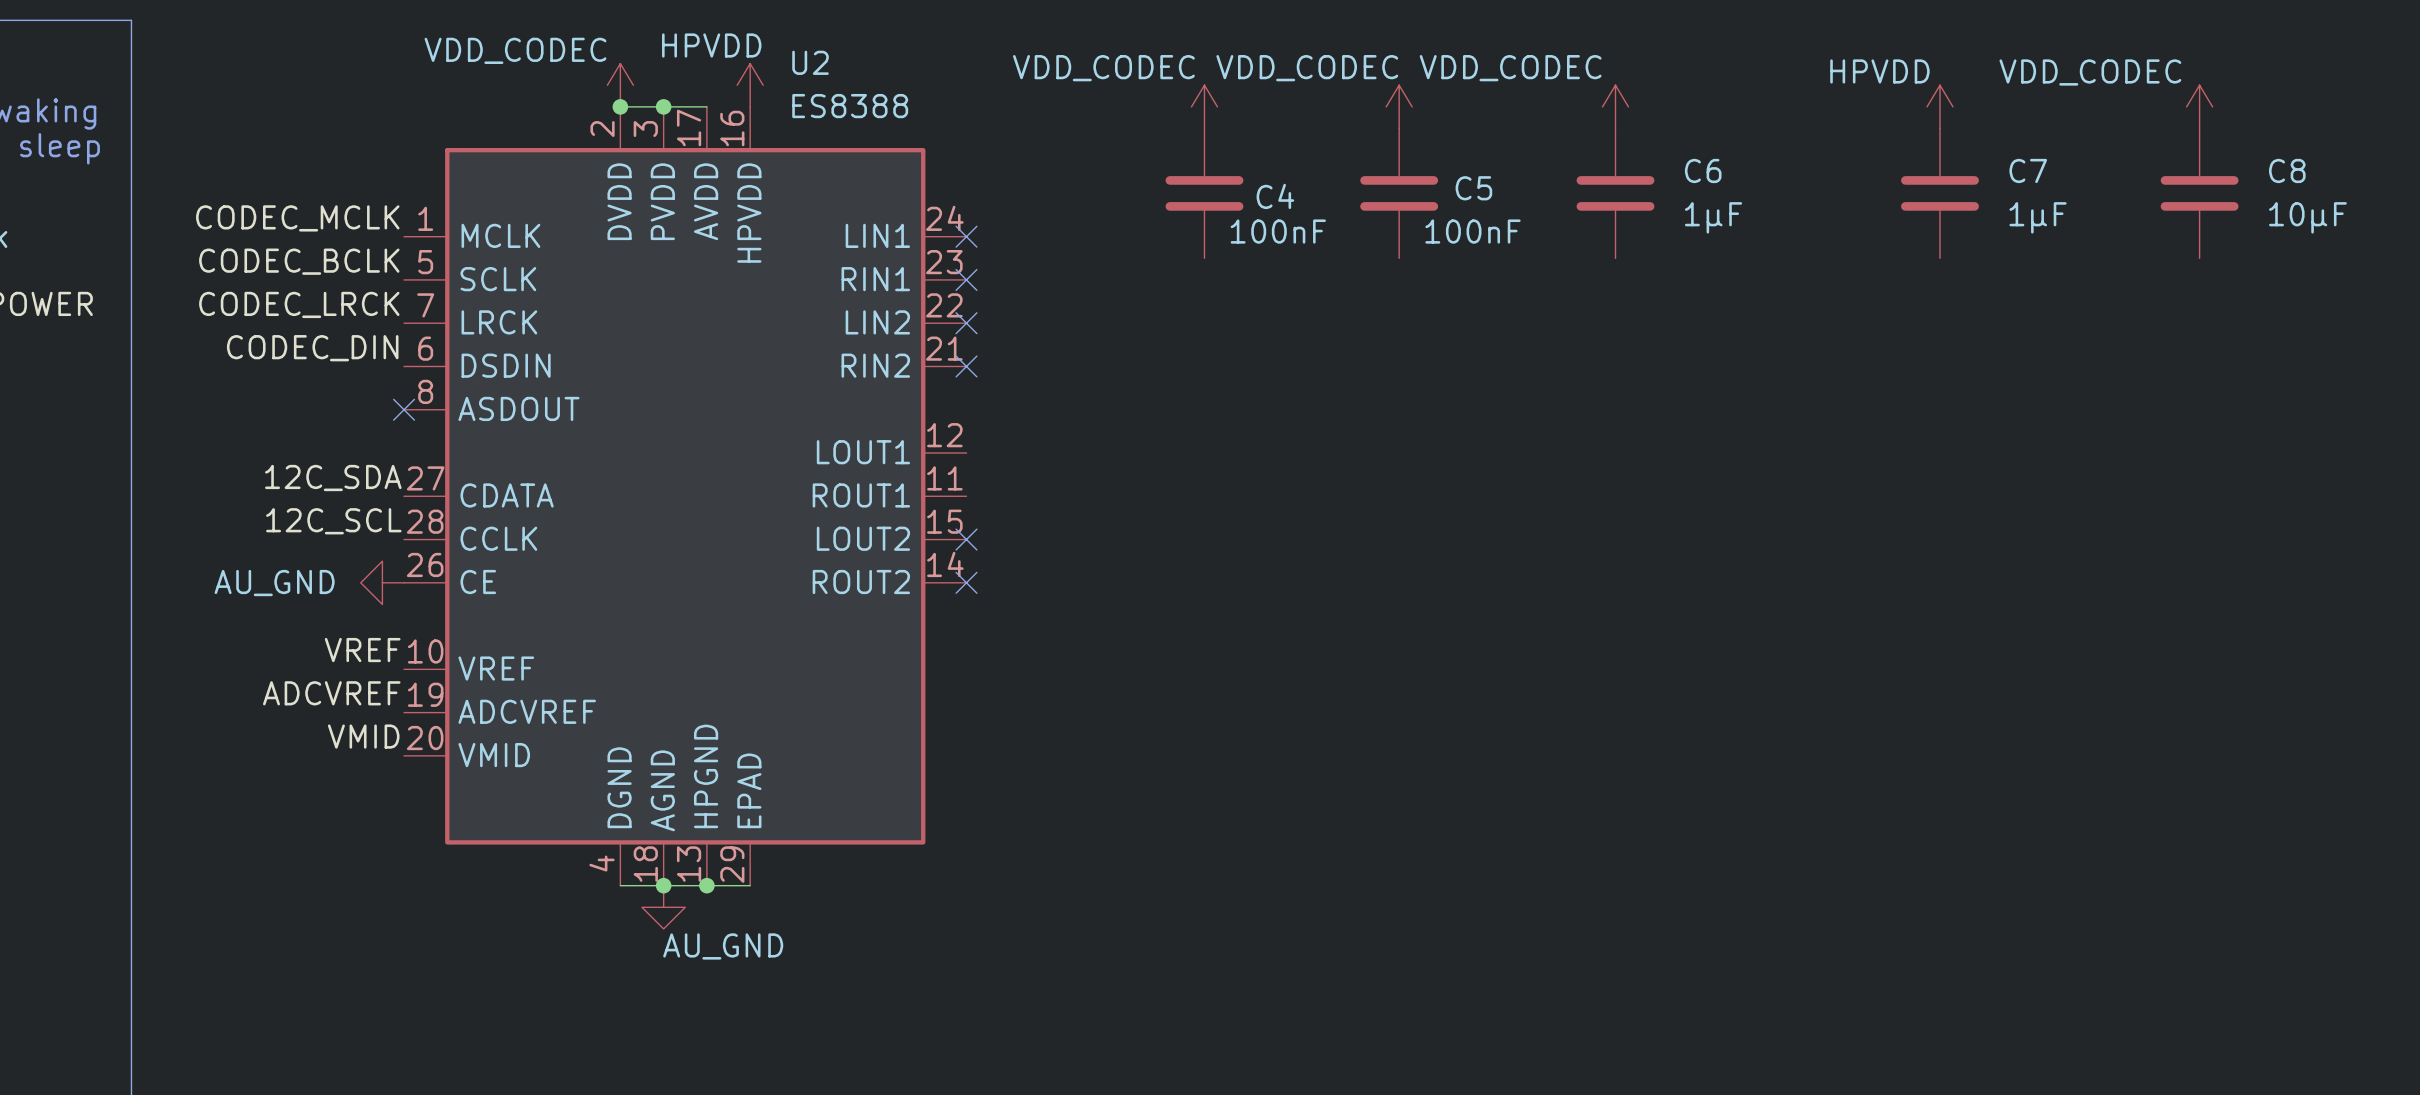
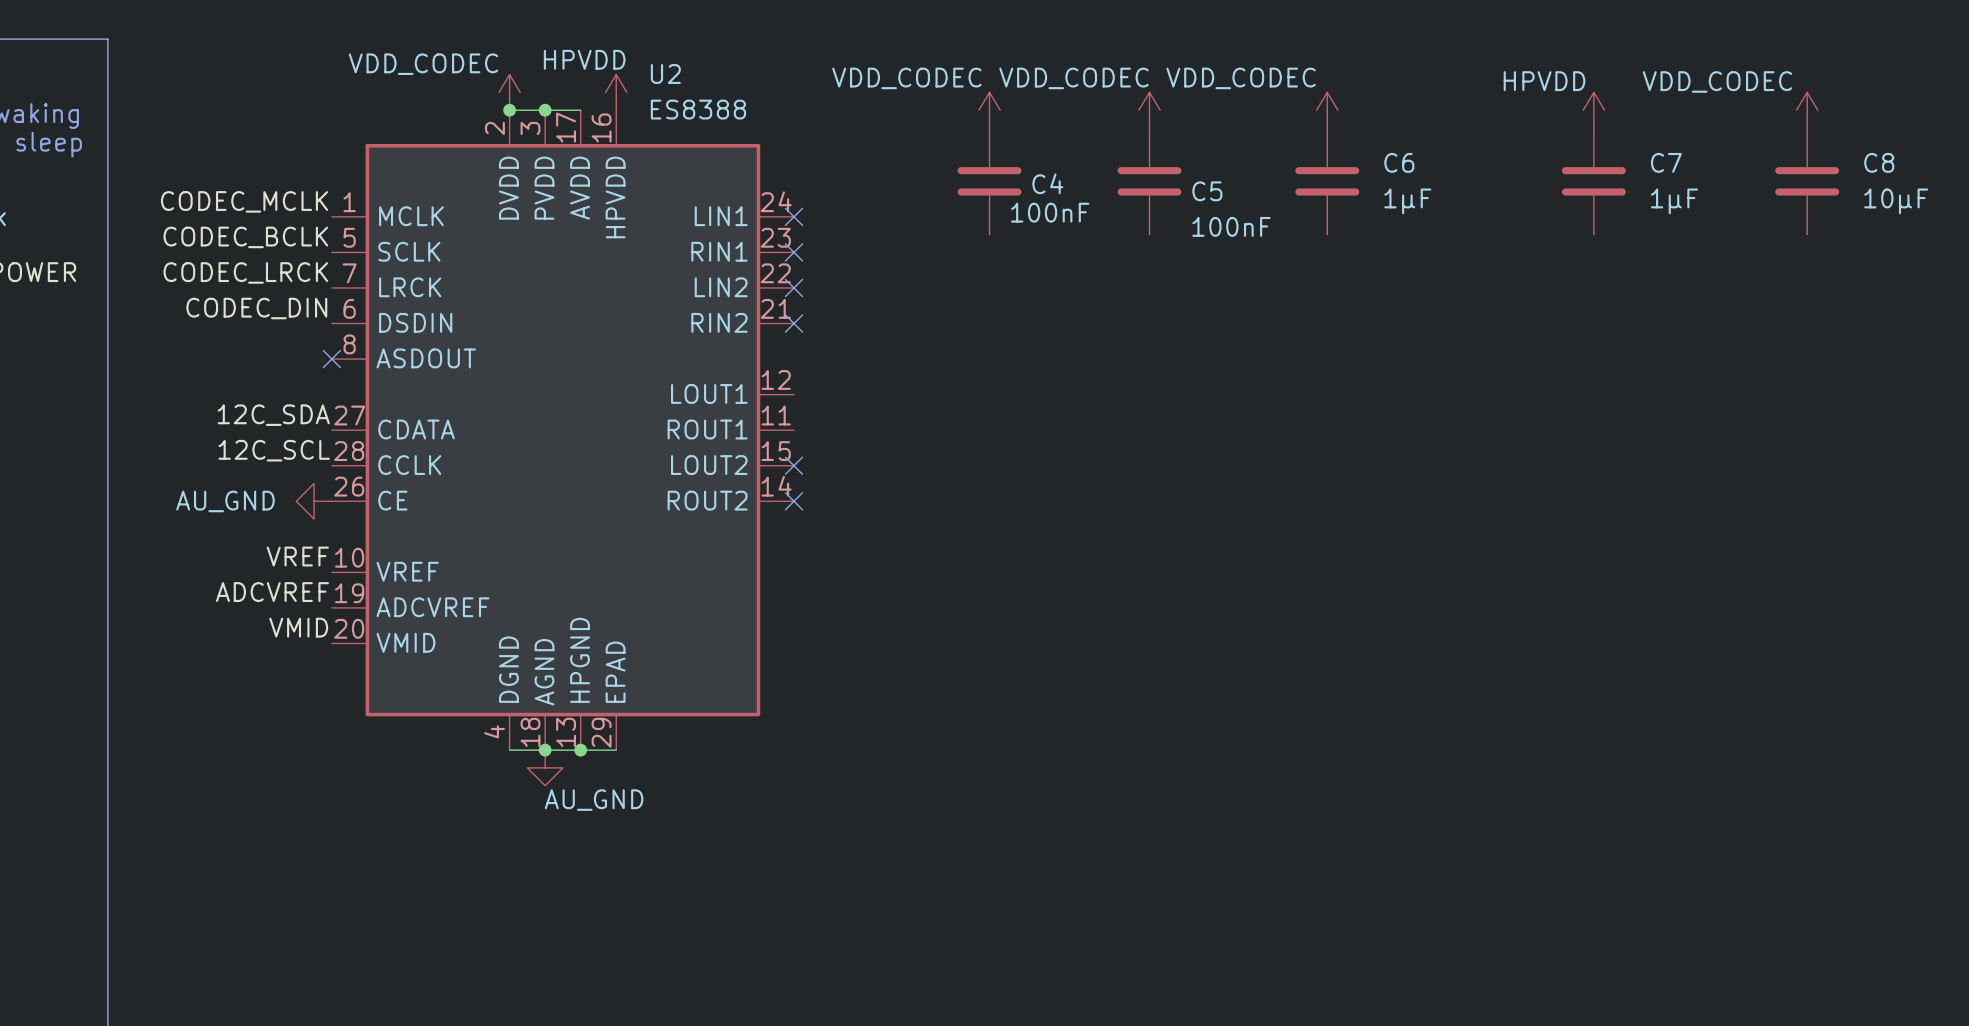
C5 name position: C5 (1473, 188) -> C5 (1207, 191)
C5 value position: 100nF (1472, 231) -> 100nF (1231, 226)

